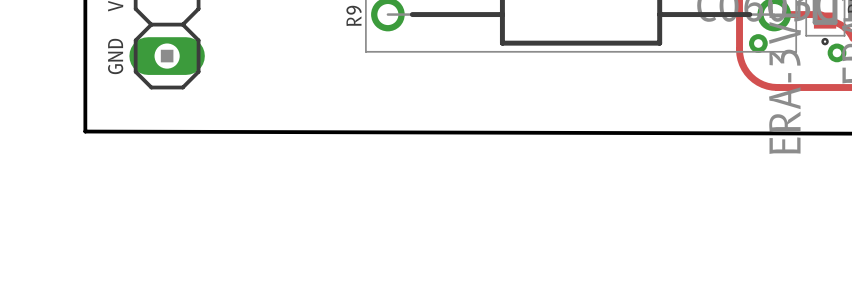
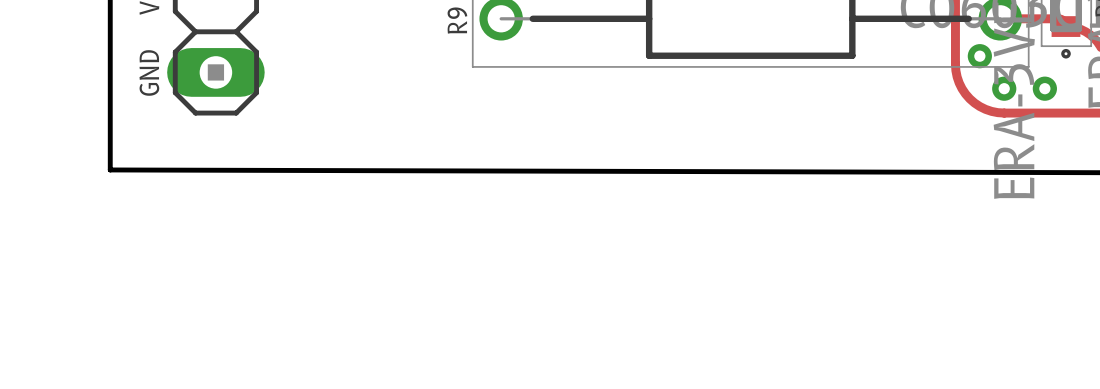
via: (837, 52) -> none
via: none -> (1004, 88)
via: none -> (1044, 88)

